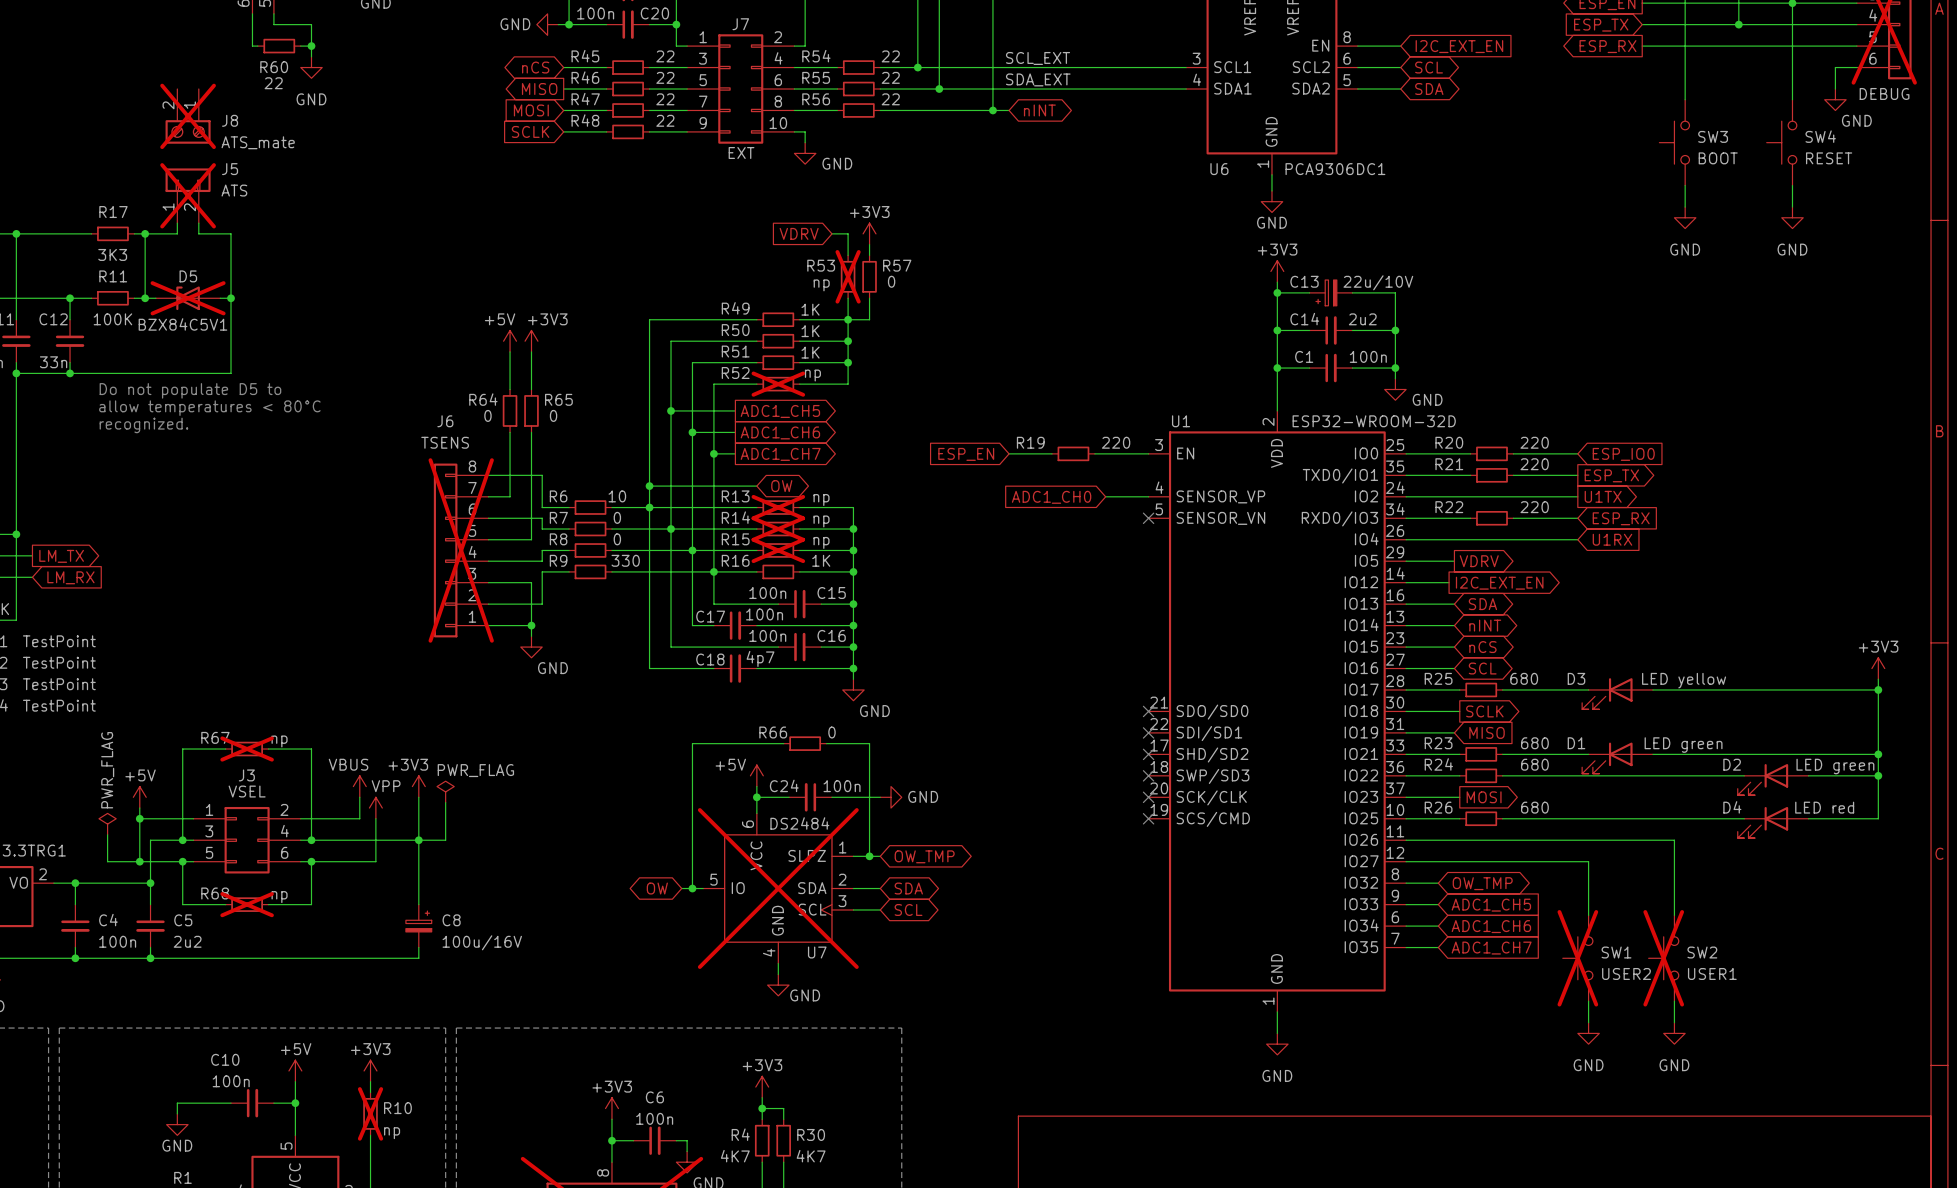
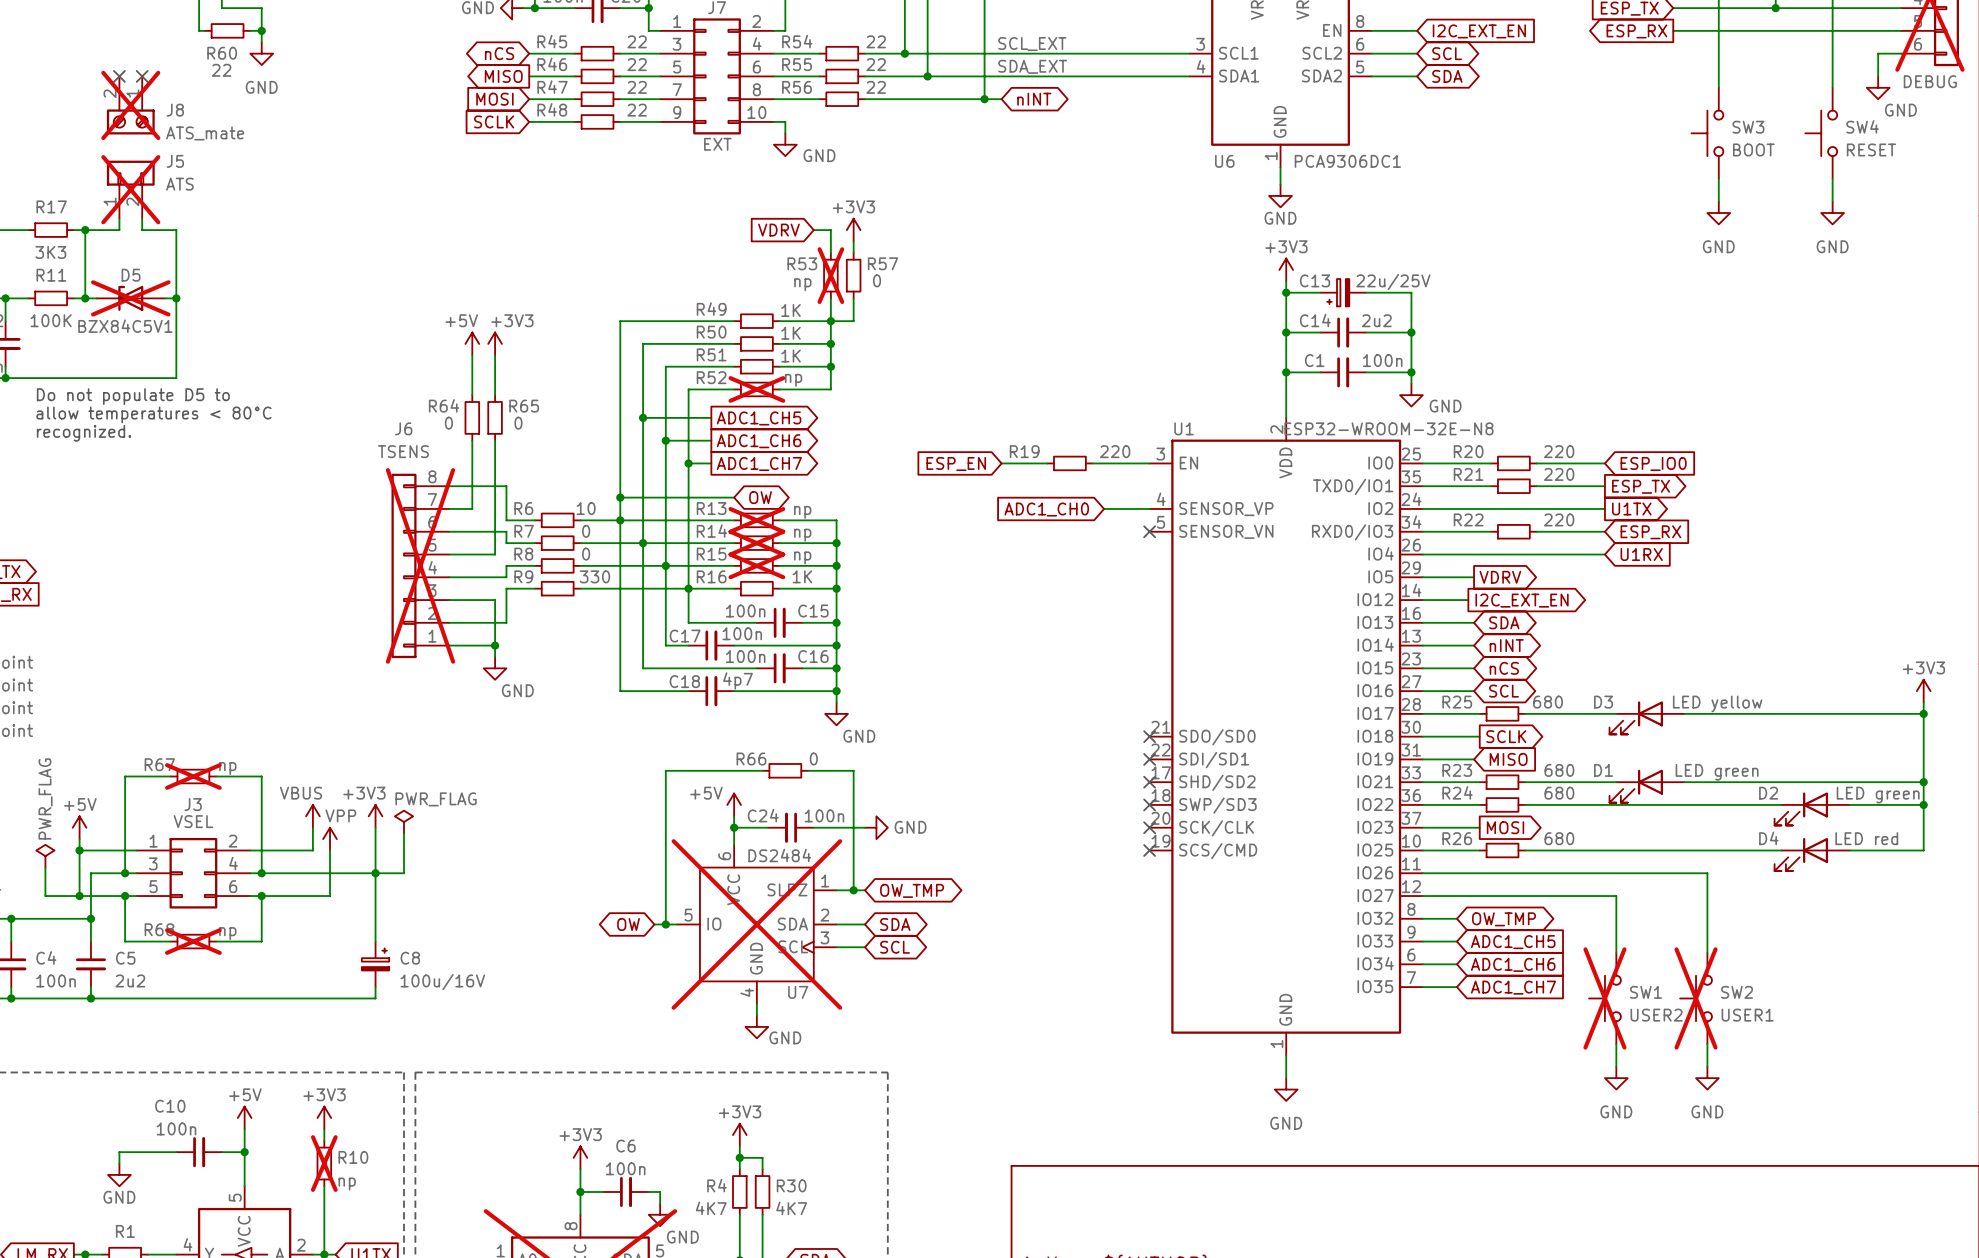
no-connect mark: none -> (119, 76)
no-connect mark: none -> (142, 76)
C13 value: 22u/10V (1378, 282) -> 22u/25V (1393, 281)
U1 value: ESP32-WROOM-32D (1374, 421) -> ESP32-WROOM-32E-N8 (1388, 428)

